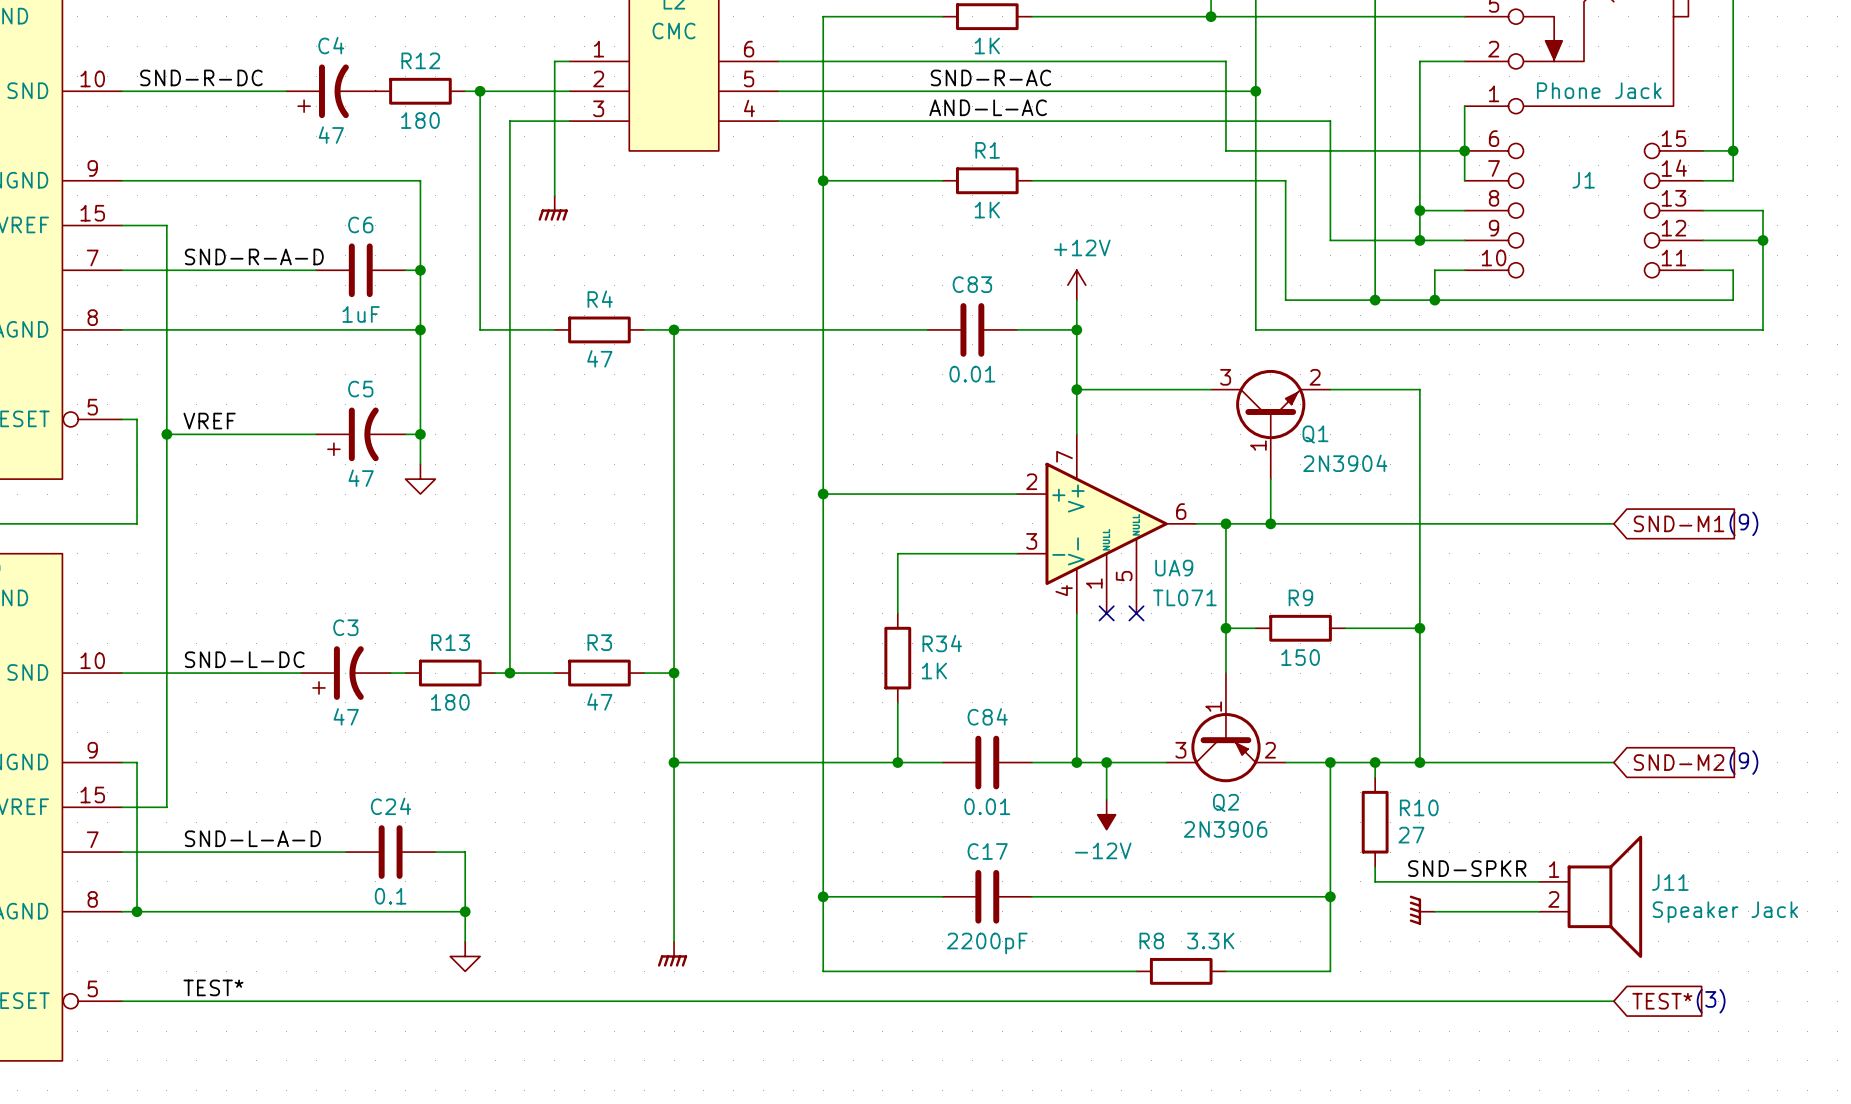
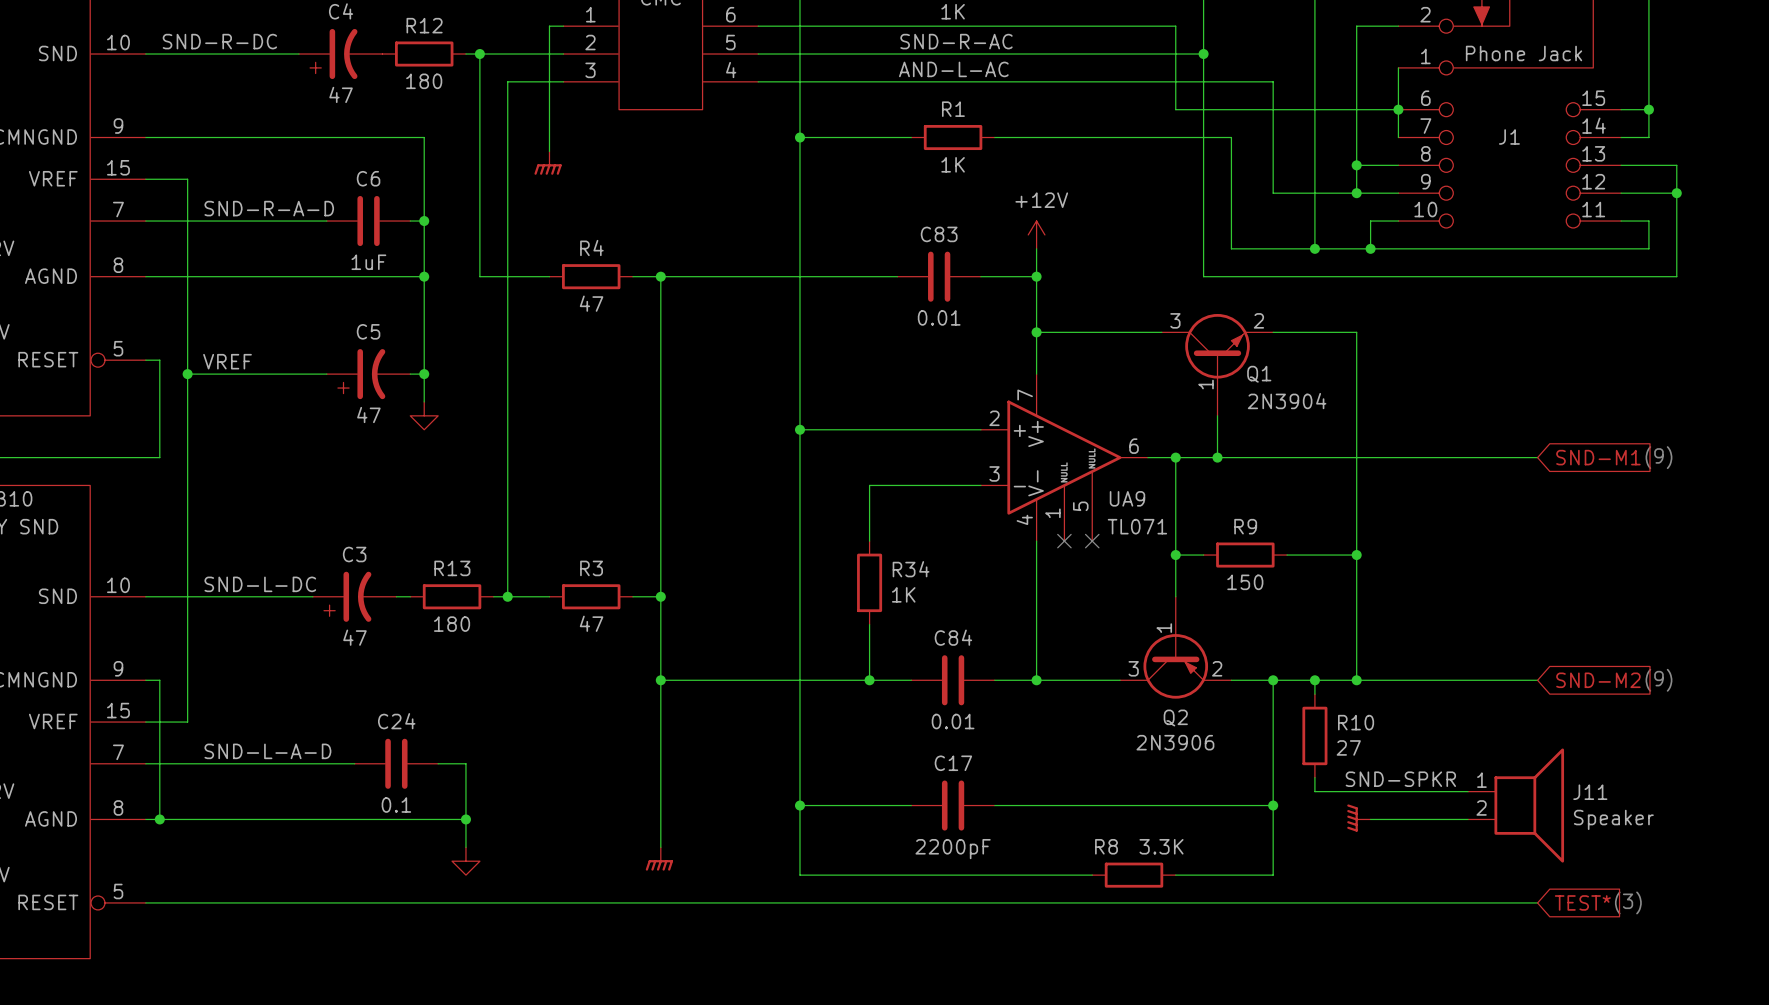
wire: (1106, 762) (1106, 799) -> none
junction: (1106, 762) -> none
power symbol: -12V (1106, 814) -> none
J11 value: Speaker Jack (1725, 912) -> Speaker (1613, 819)
label: TEST* (213, 987) -> none

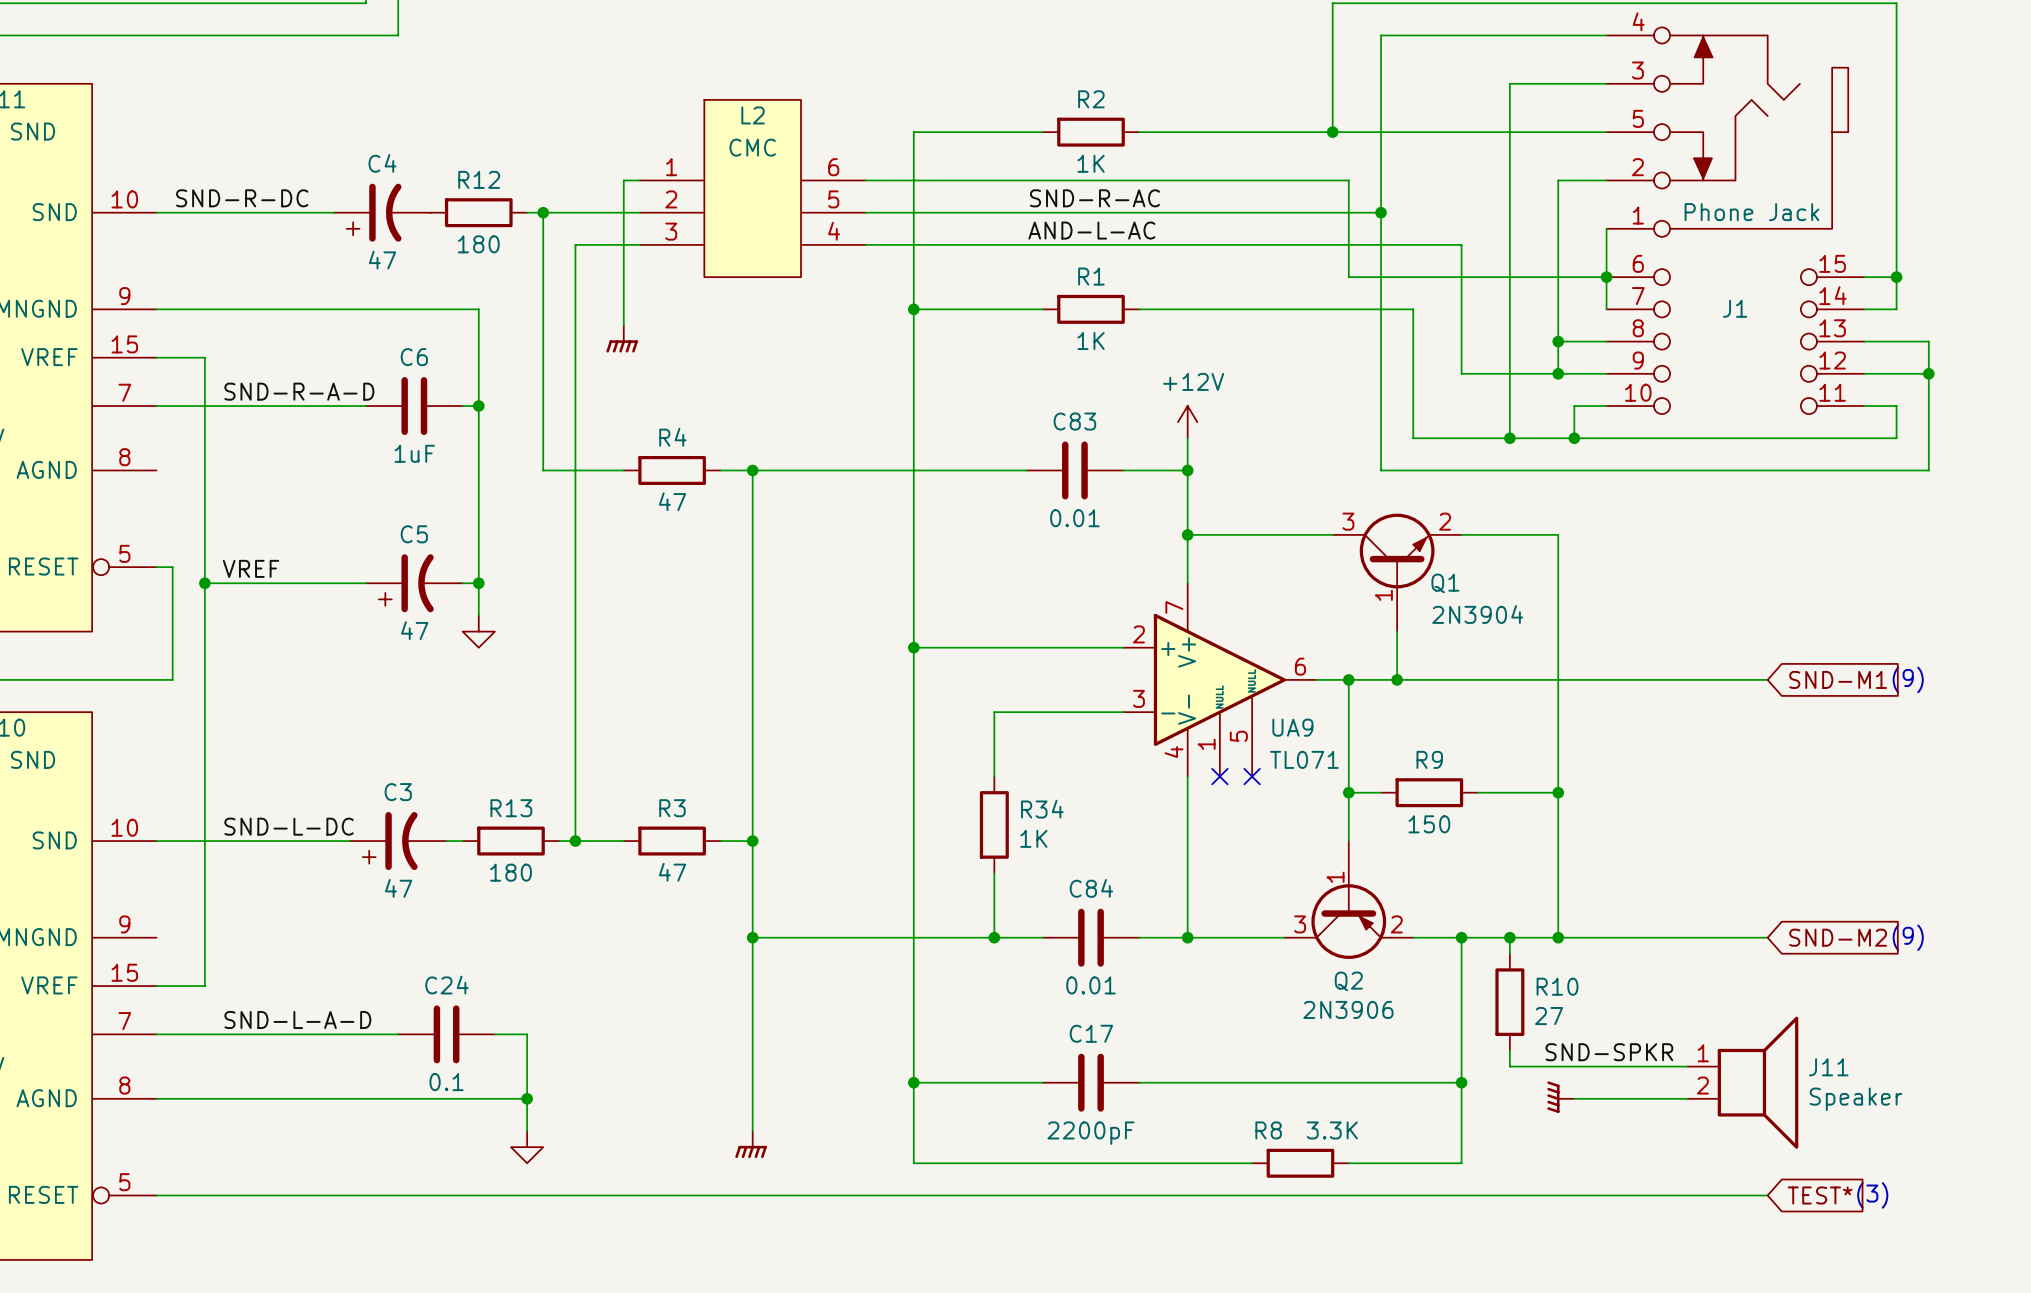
wire: (145, 276) (424, 276) -> none
junction: (424, 276) -> none
wire: (145, 680) (159, 680) (159, 819) -> none
junction: (159, 819) -> none

